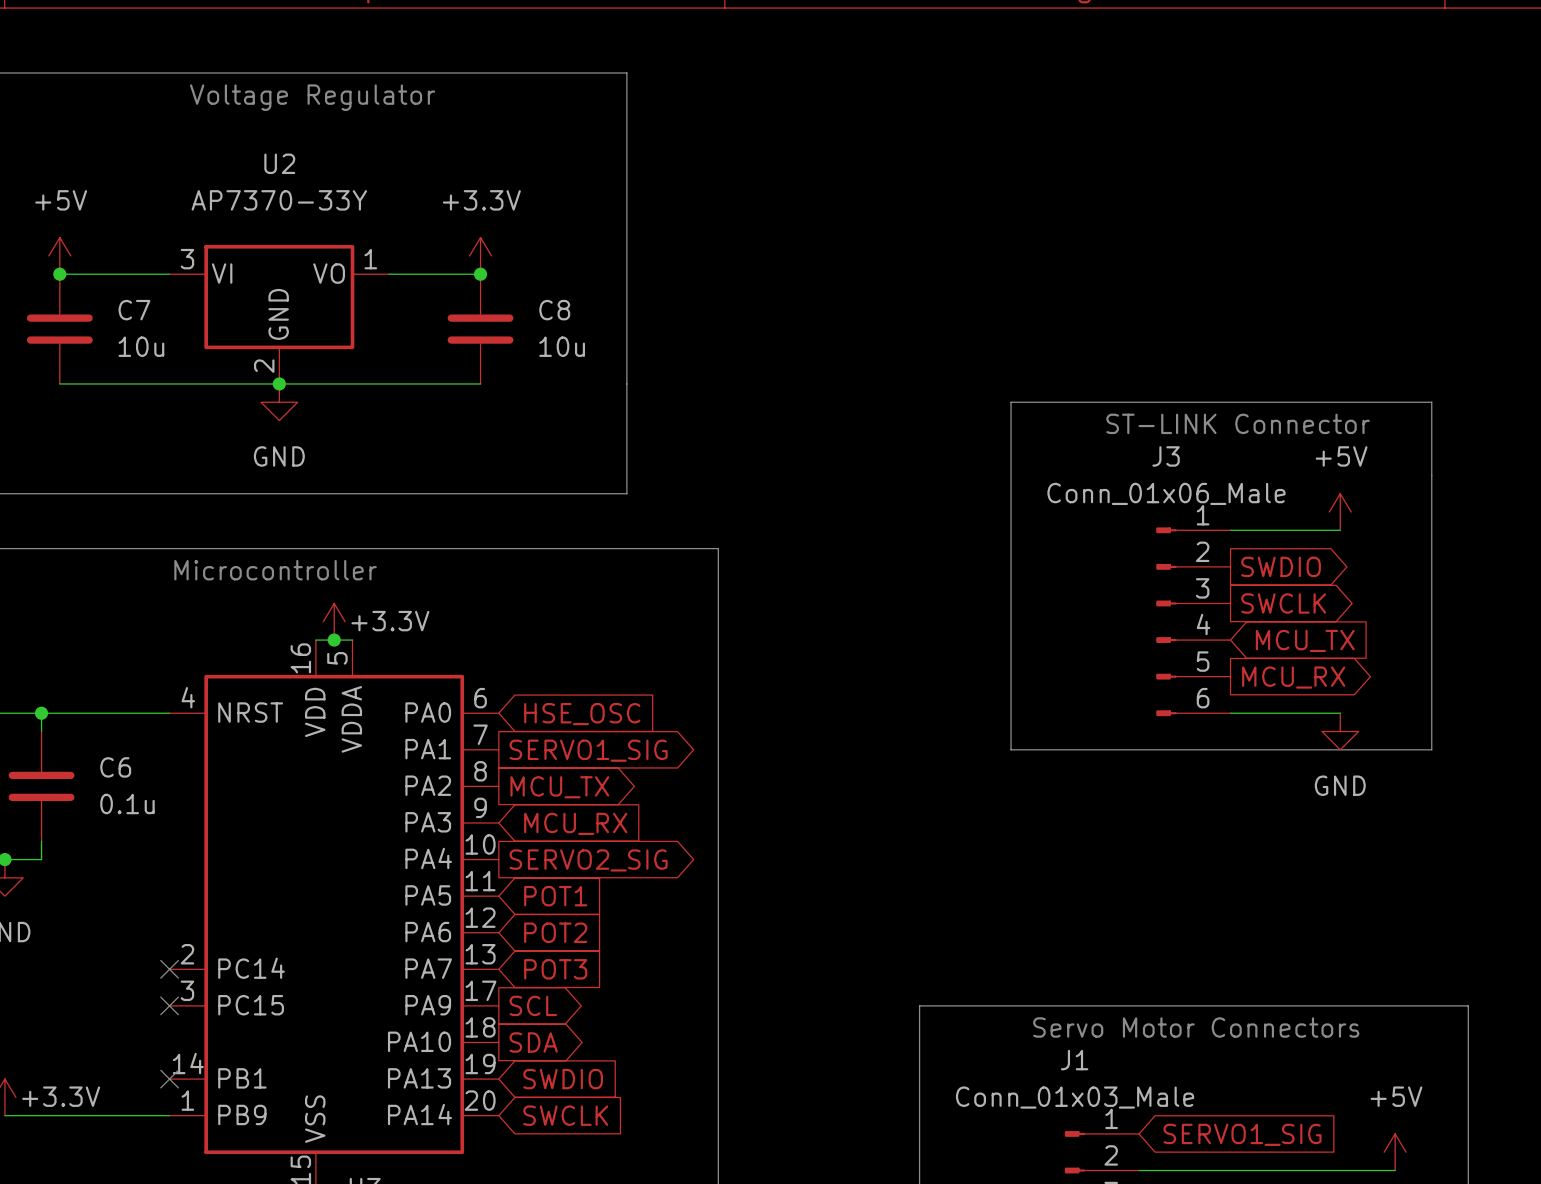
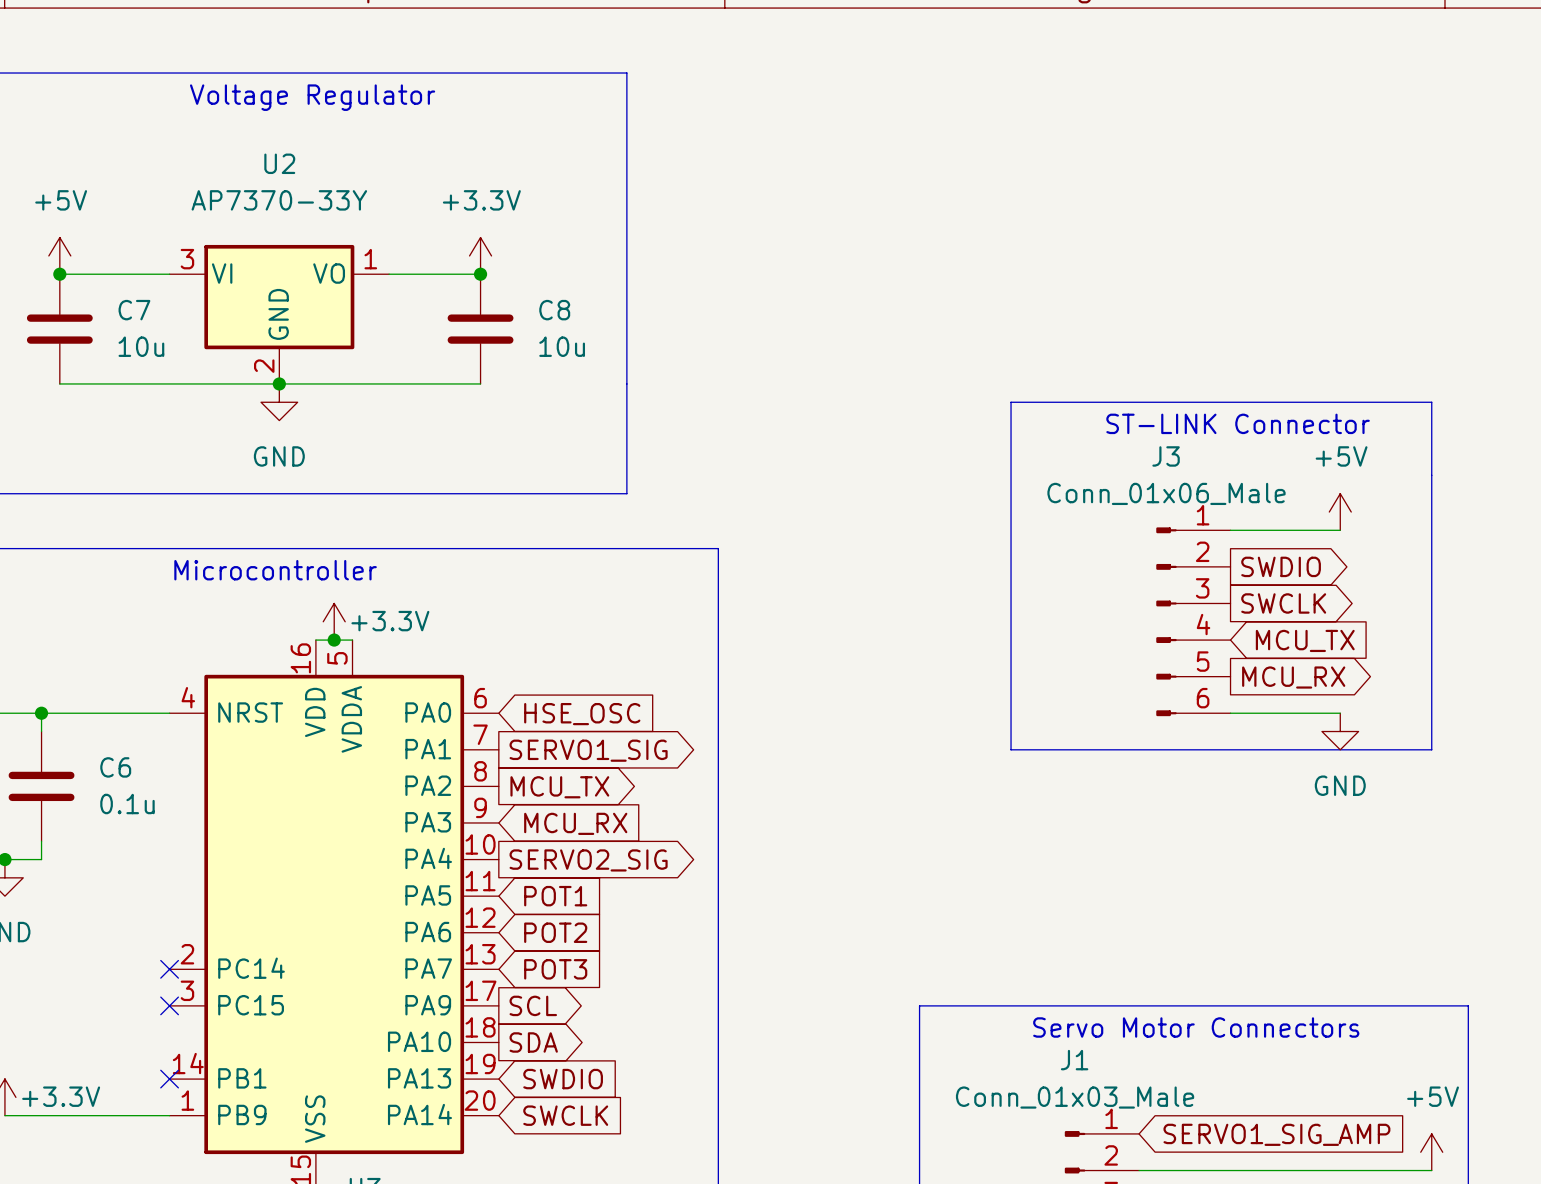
global label: SERVO1_SIG (1242, 1134) -> SERVO1_SIG_AMP (1276, 1134)
power symbol position: +5V (1395, 1152) -> +5V (1431, 1152)
wire: none -> (1395, 1170) (1431, 1170)

